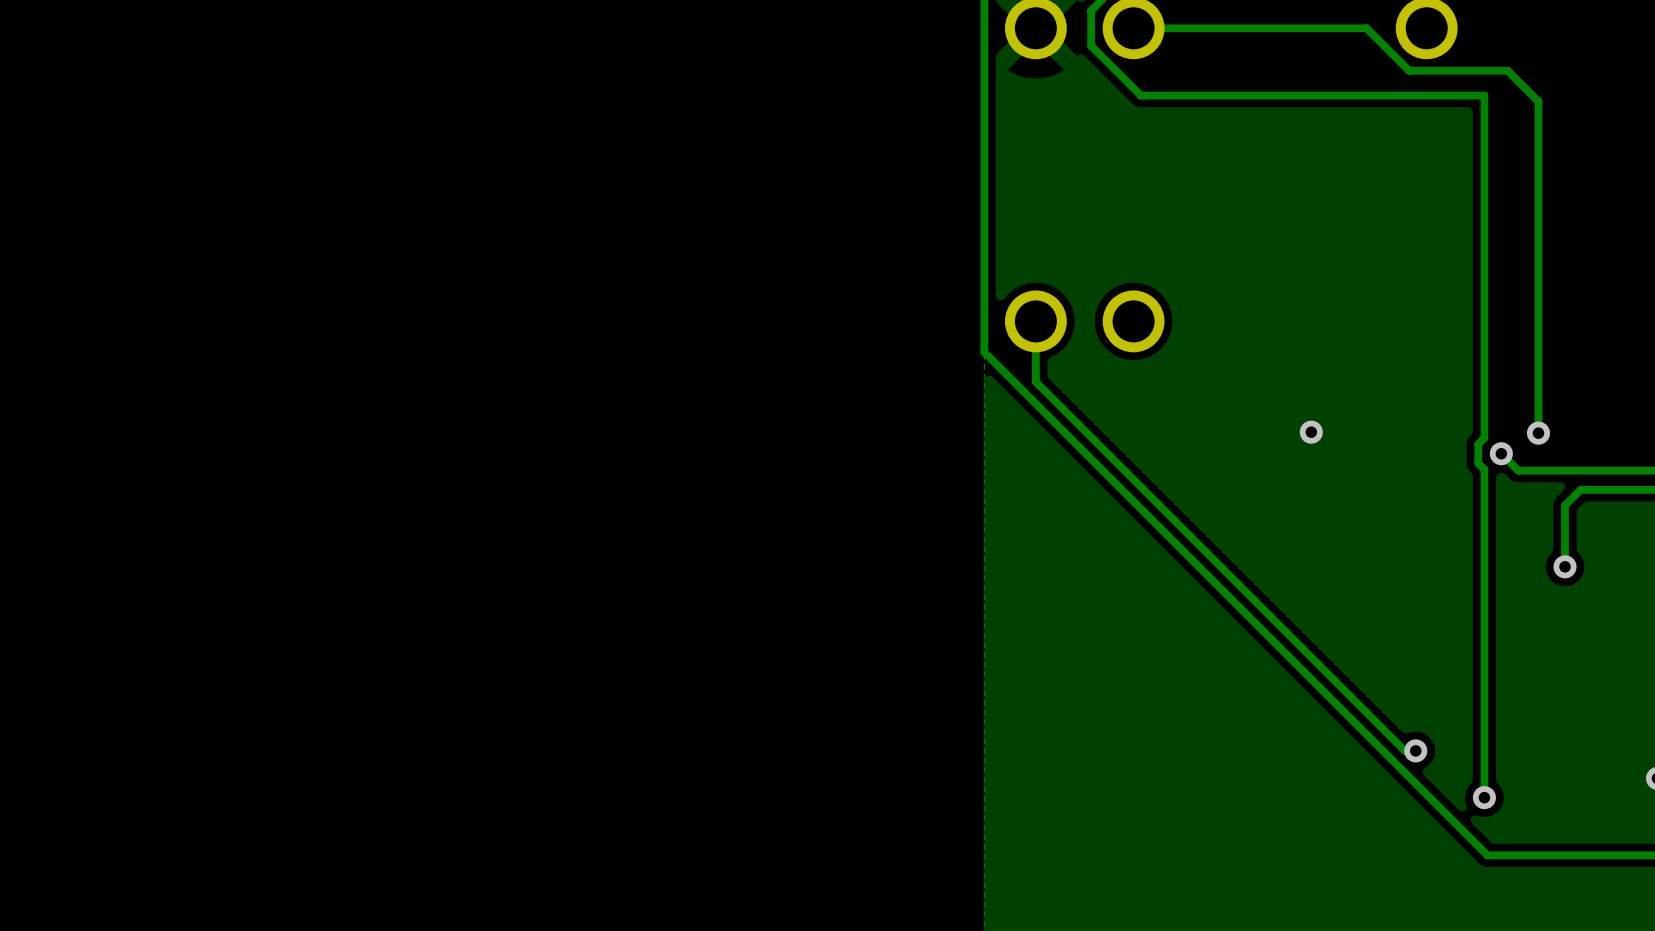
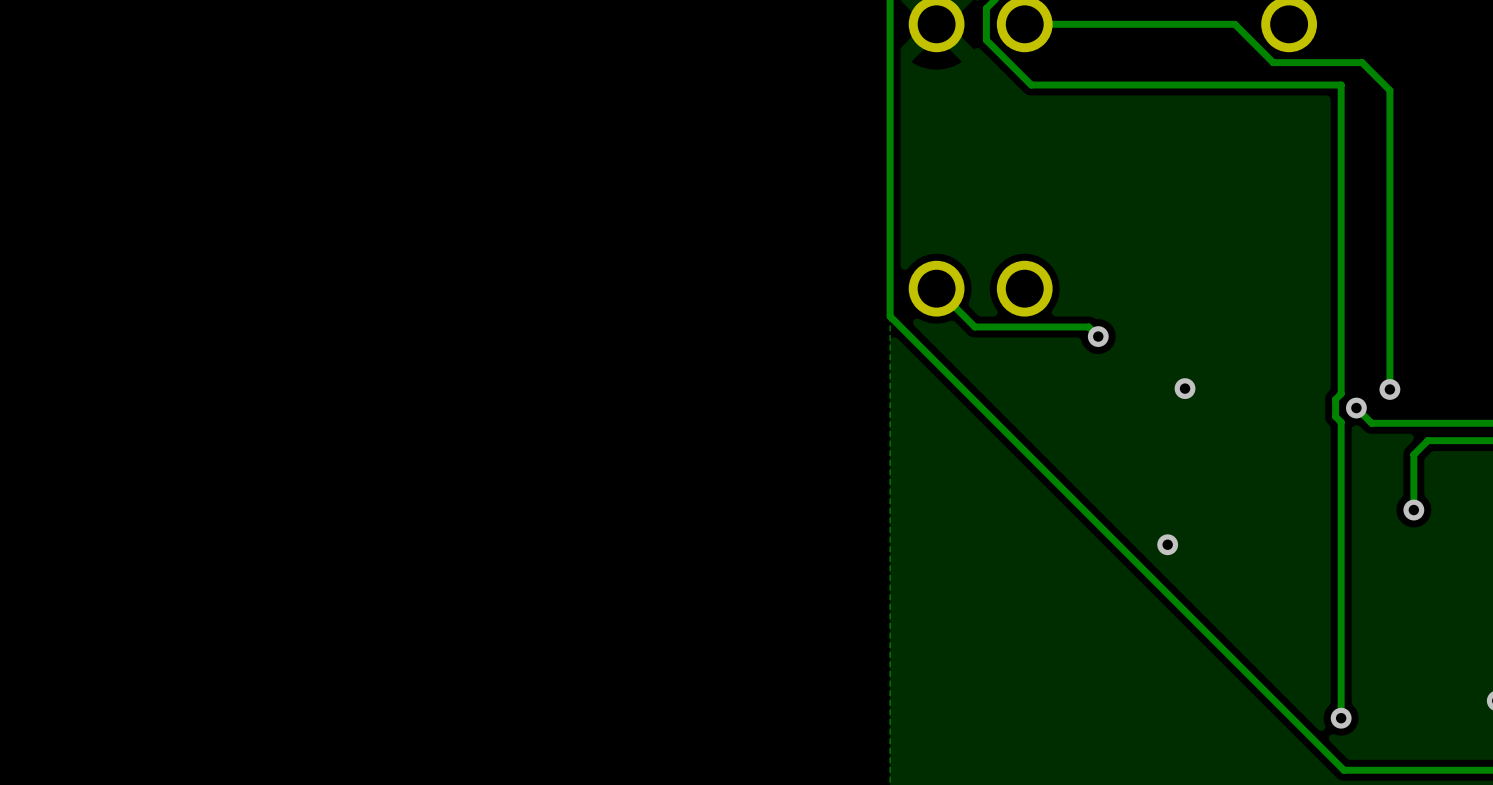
track: (1035, 321) (1035, 381) (1404, 750) (1415, 750) -> (936, 288) (974, 326) (1088, 326) (1098, 336)
via: none -> (1098, 336)
via position: (1415, 750) -> (1167, 544)

